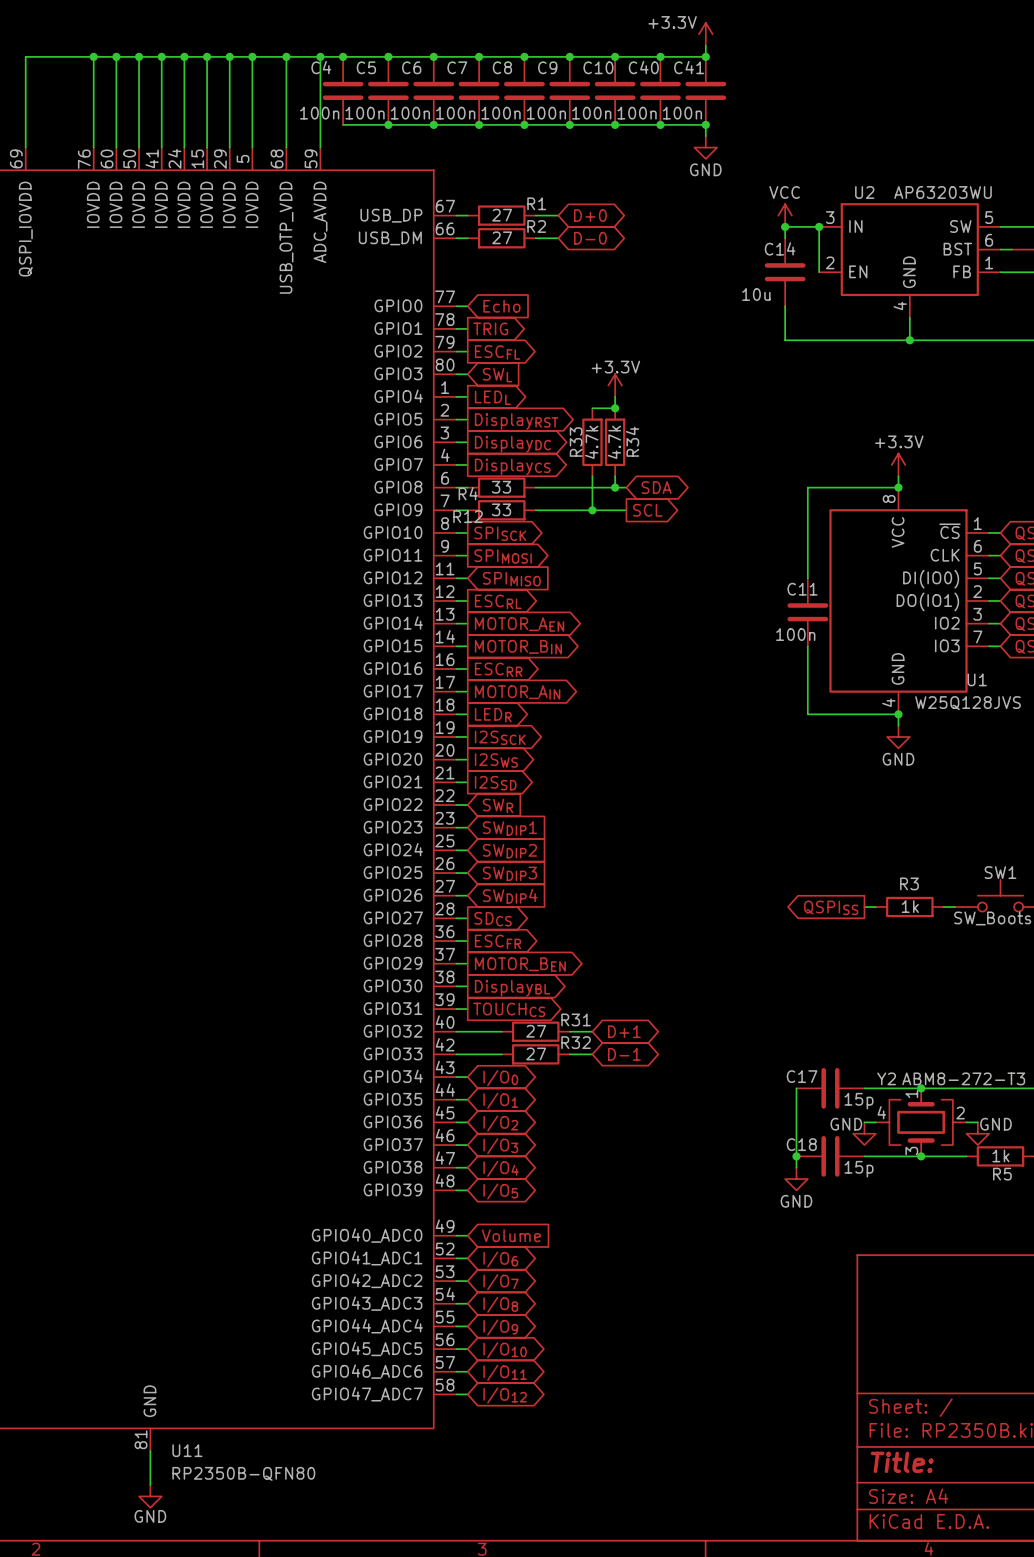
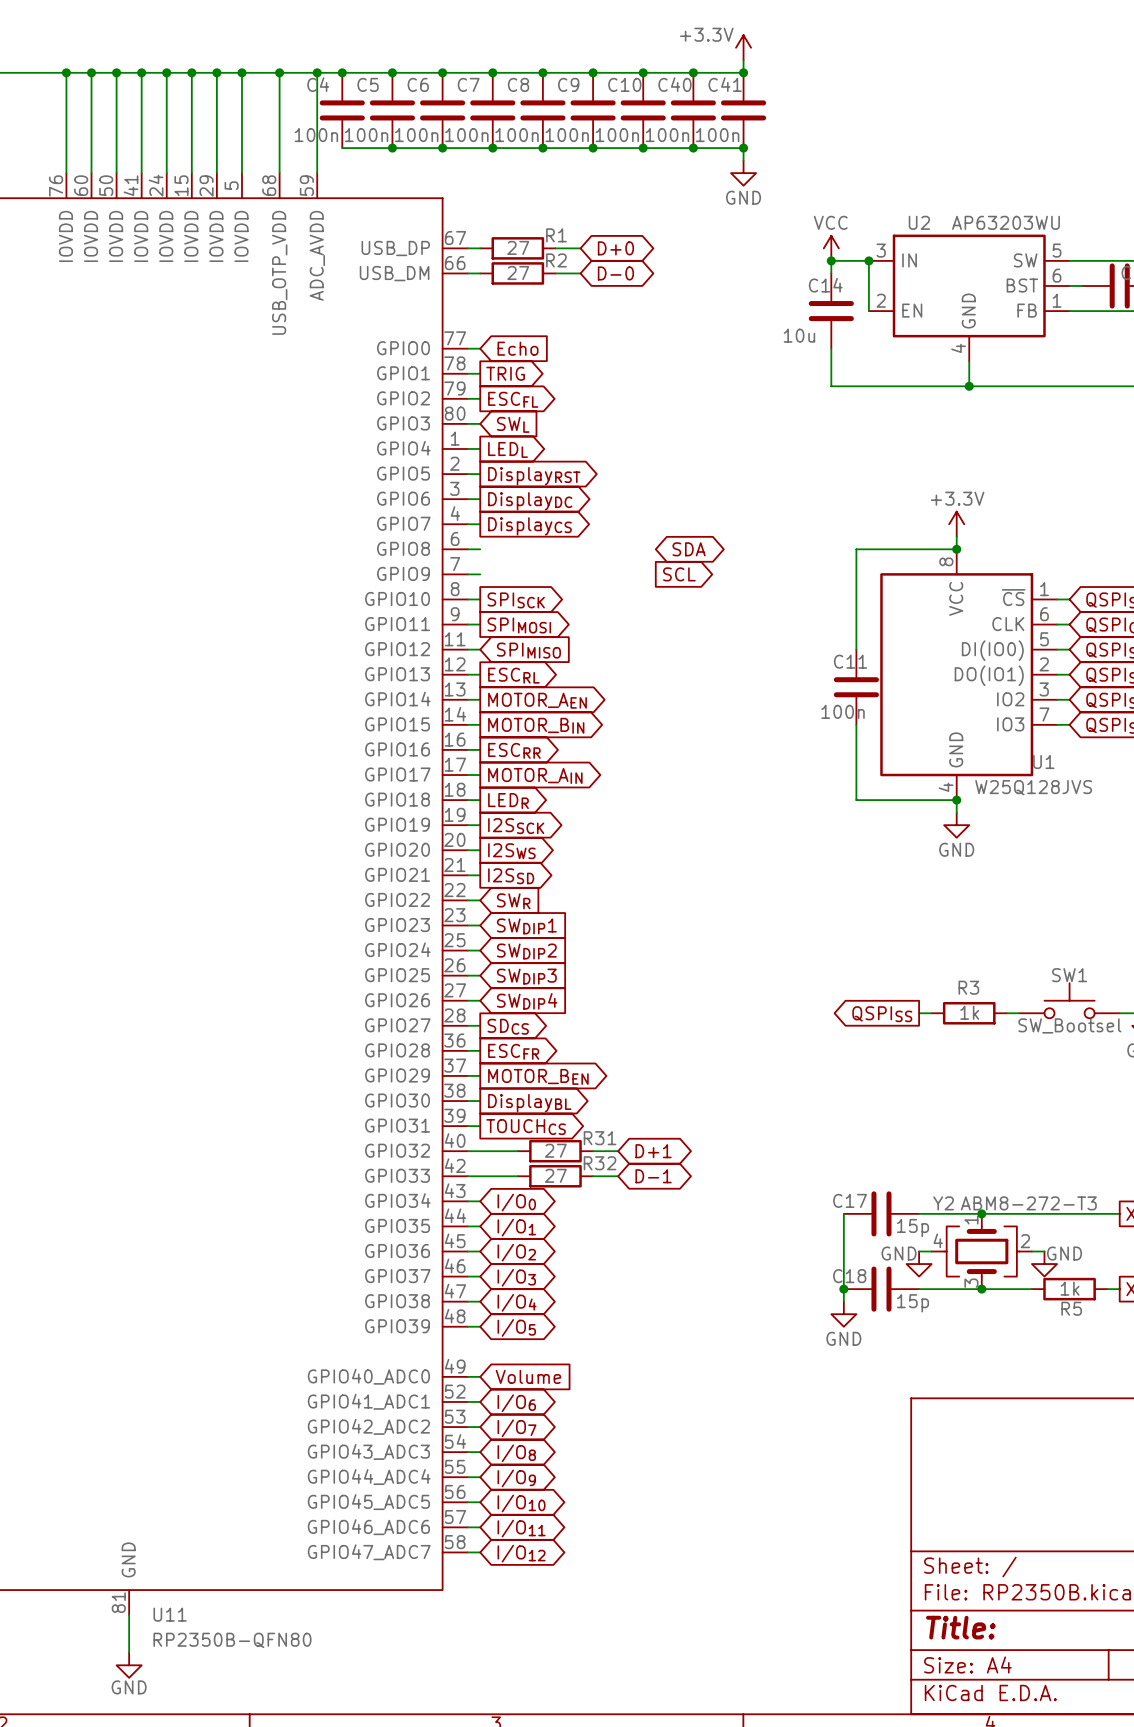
power symbol: +3.3V (615, 385) -> none
wire: (615, 396) (615, 408) (592, 408) -> none
junction: (615, 408) -> none
R33: 4.7k (592, 442) -> none
R34: 4.7k (615, 442) -> none
wire: (592, 476) (592, 510) -> none
wire: (615, 476) (615, 487) -> none
R4: 33 (501, 487) -> none
wire: (535, 487) (626, 487) -> none
junction: (615, 487) -> none
R12: 33 (501, 510) -> none
wire: (535, 510) (626, 510) -> none
junction: (592, 510) -> none

